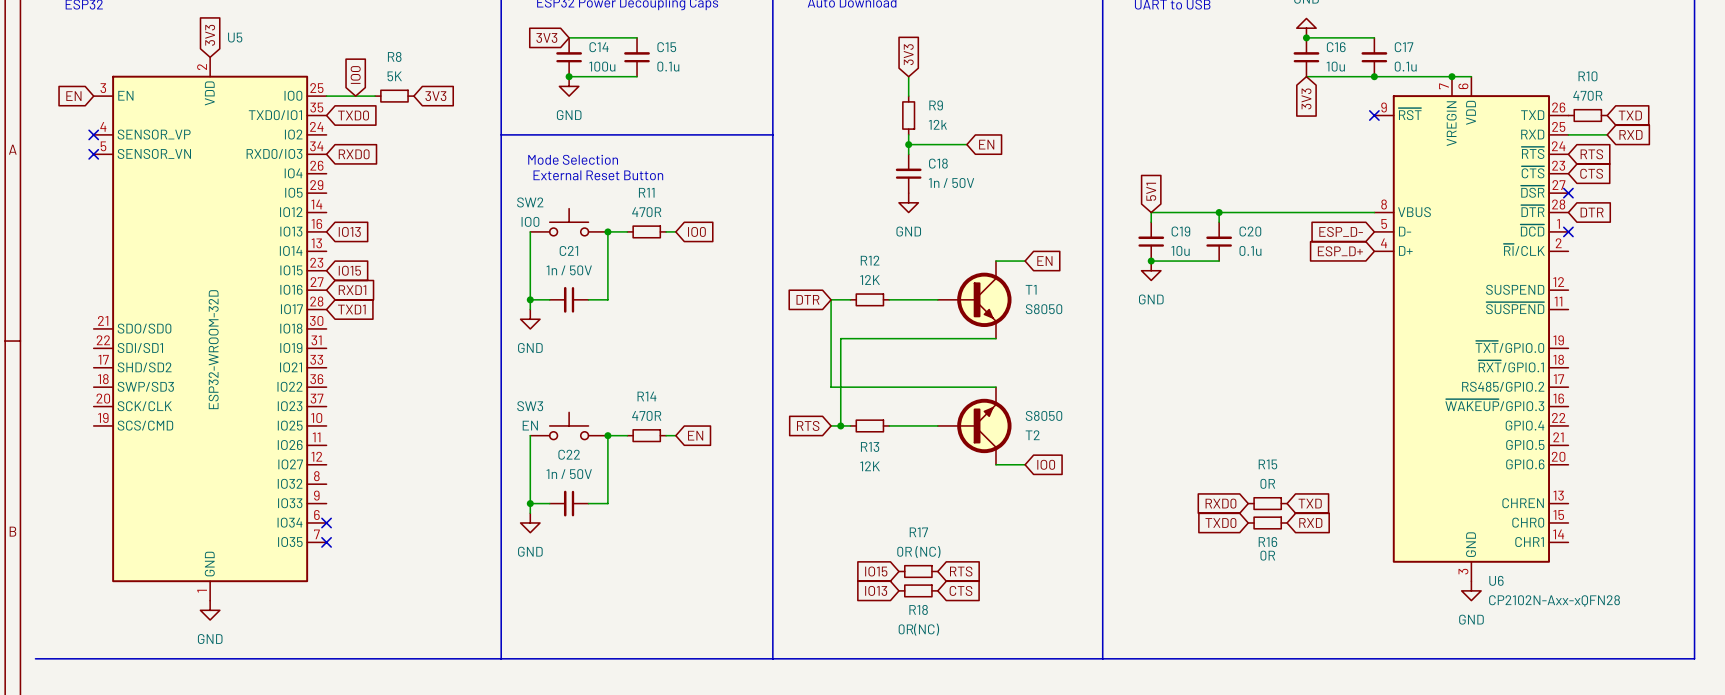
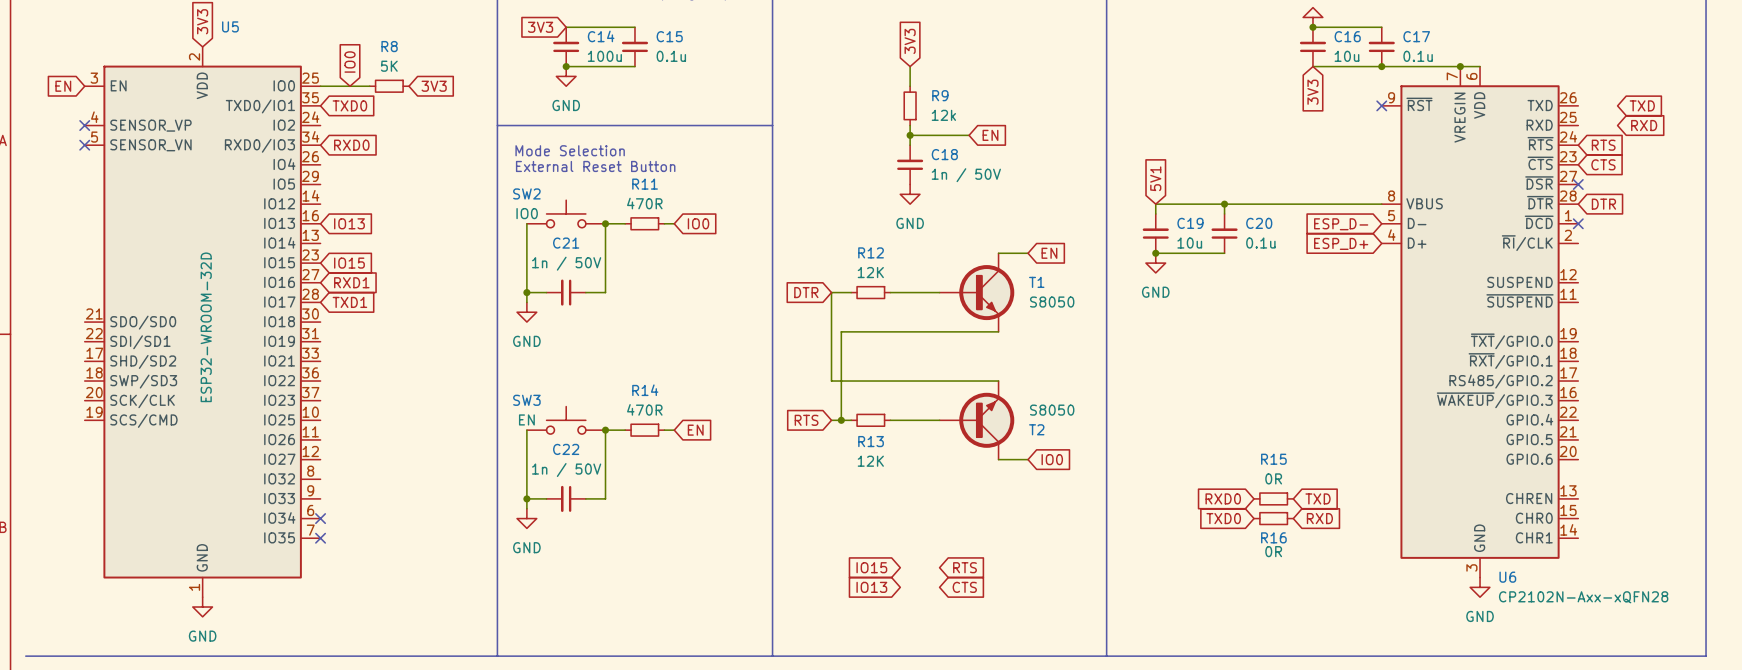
R10: 470R (1587, 115) -> none
wire: (1568, 134) (1607, 134) -> none
R17: 0R (NC) (918, 571) -> none
R18: 0R(NC) (918, 590) -> none

